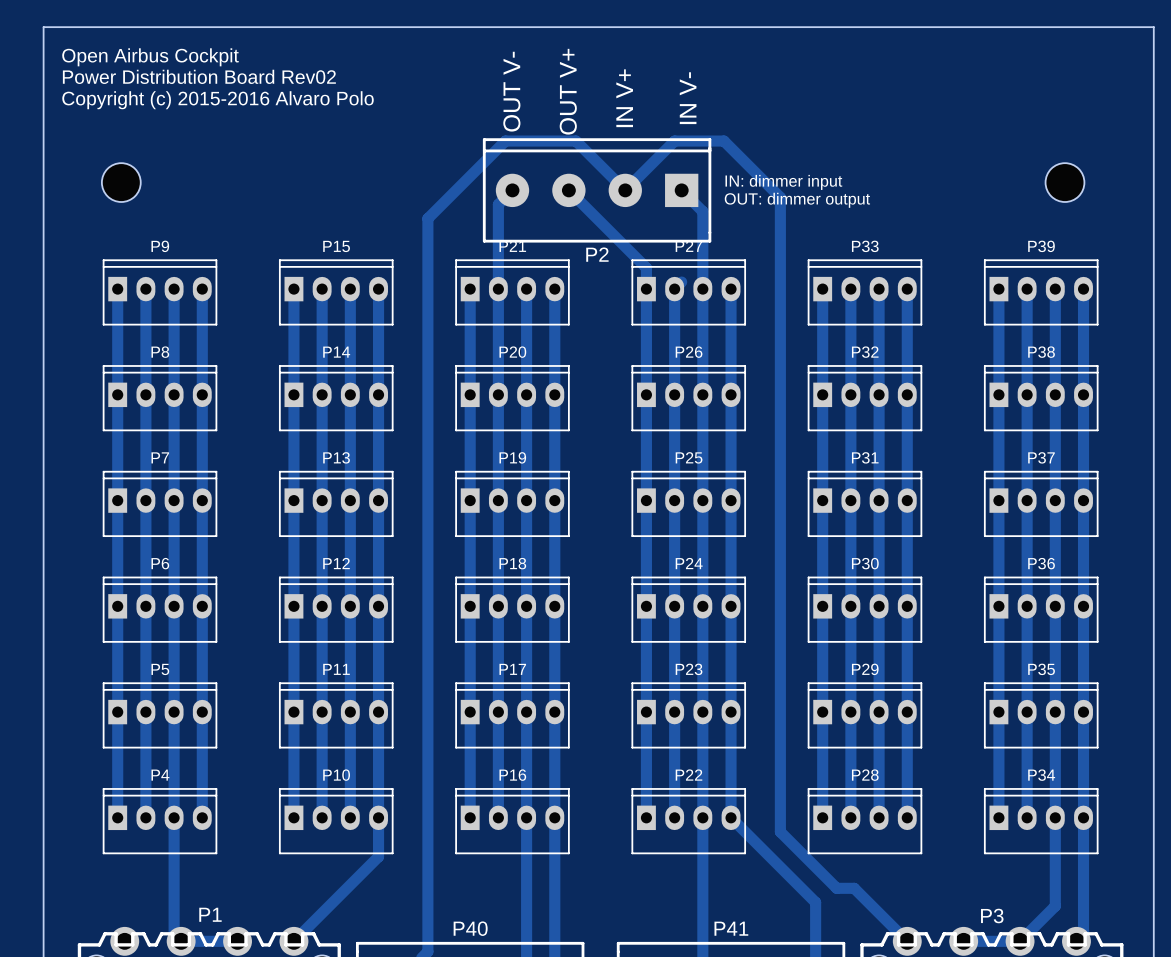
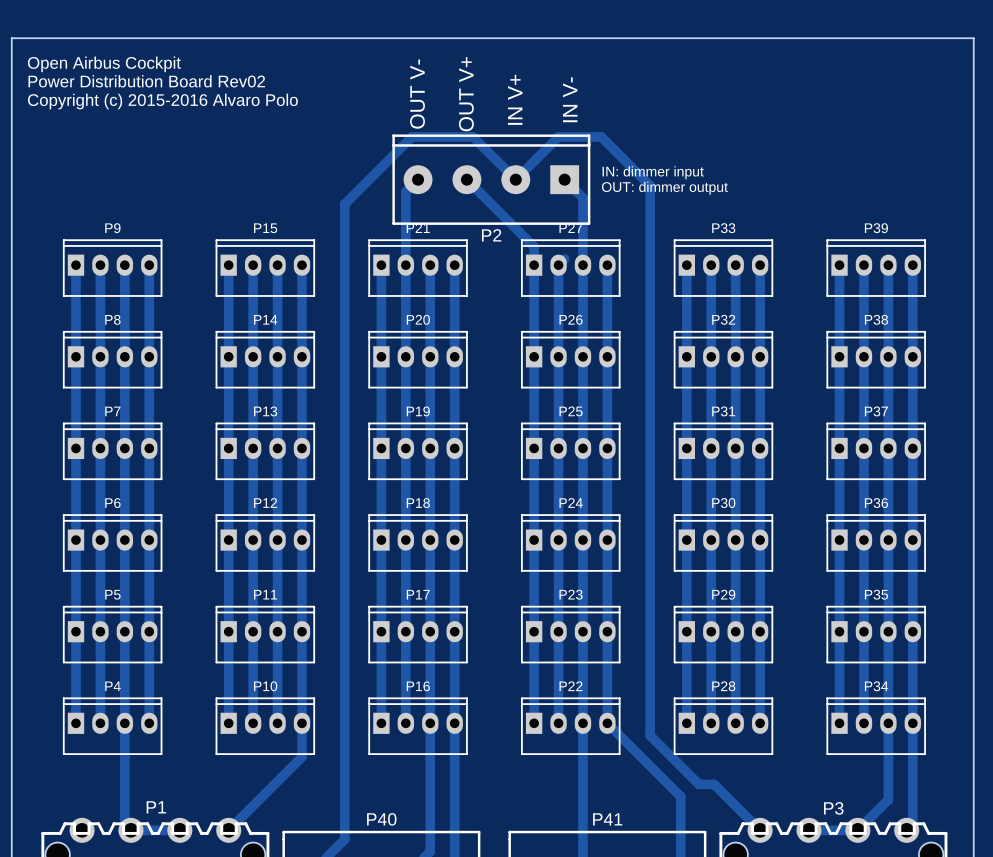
part: (121, 182) -> none
part: (1064, 182) -> none

